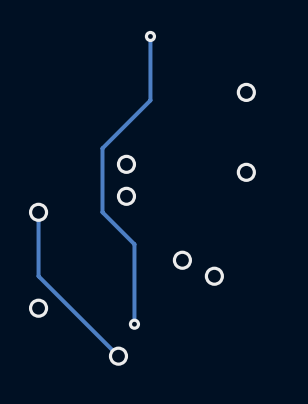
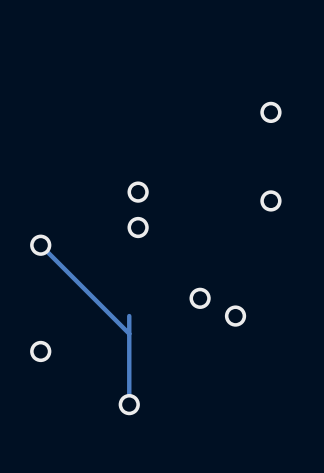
track: (150, 36) (150, 100) (102, 148) (102, 212) (134, 244) (134, 324) -> none
via: (150, 36) -> none
track: (38, 212) (38, 276) (118, 356) -> (40, 245) (129, 333)
track: none -> (129, 316) (129, 404)
via: (134, 324) -> none

